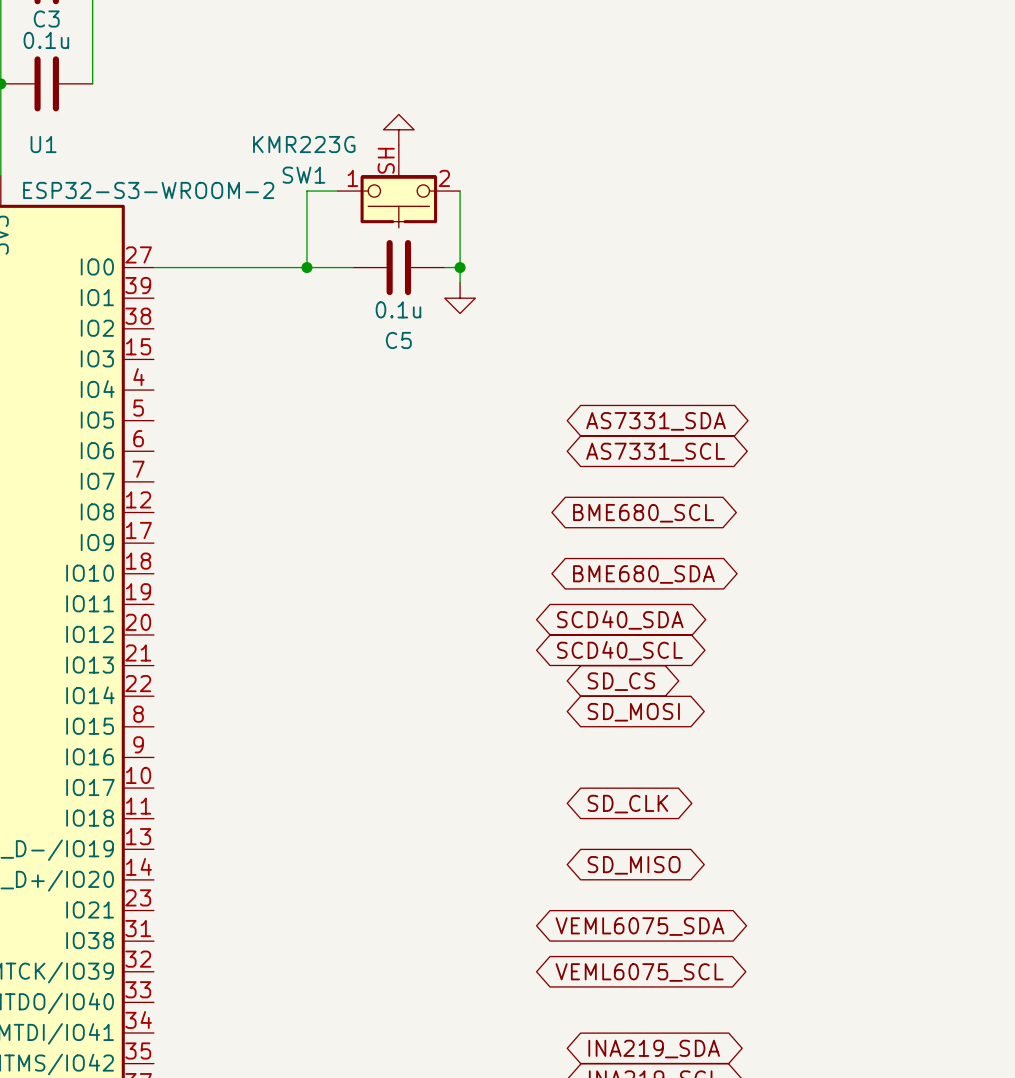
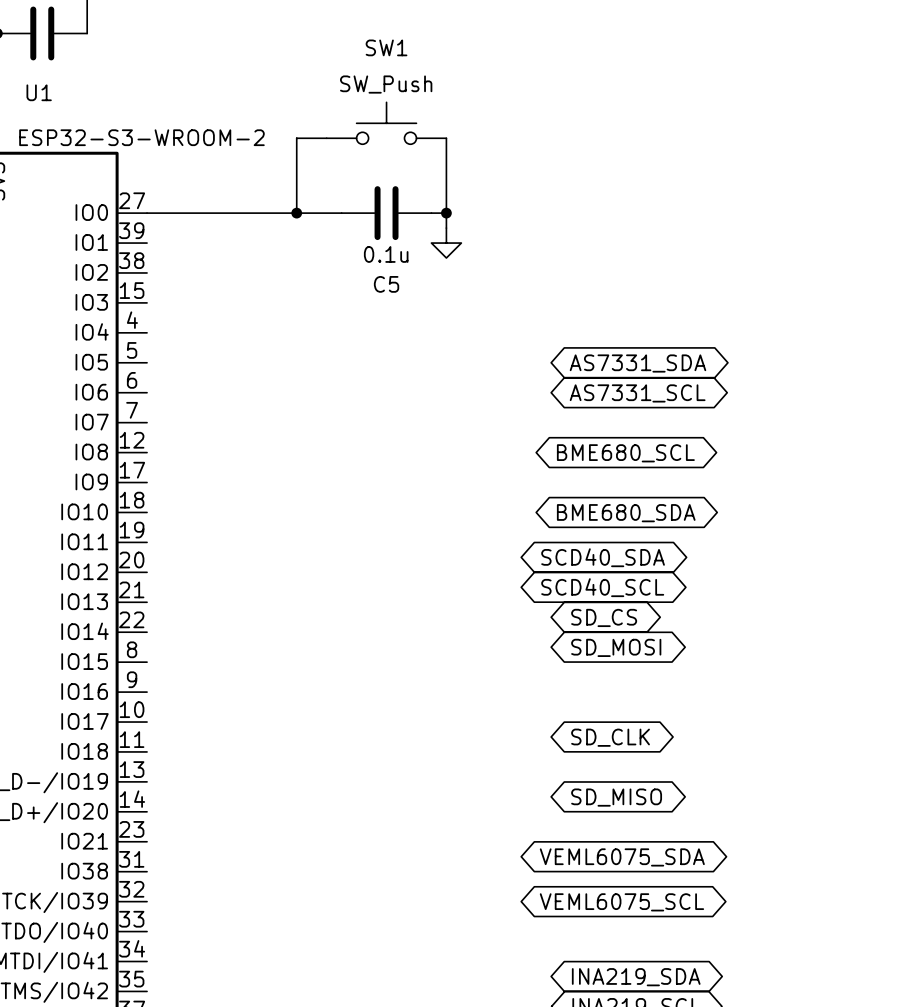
power symbol: (398, 129) -> none
SW1 value: KMR223G (304, 144) -> SW_Push (386, 84)
SW1 symbol: [337, 145, 461, 228] -> [326, 102, 447, 145]
SW1 name position: SW1 (303, 175) -> SW1 (386, 47)

